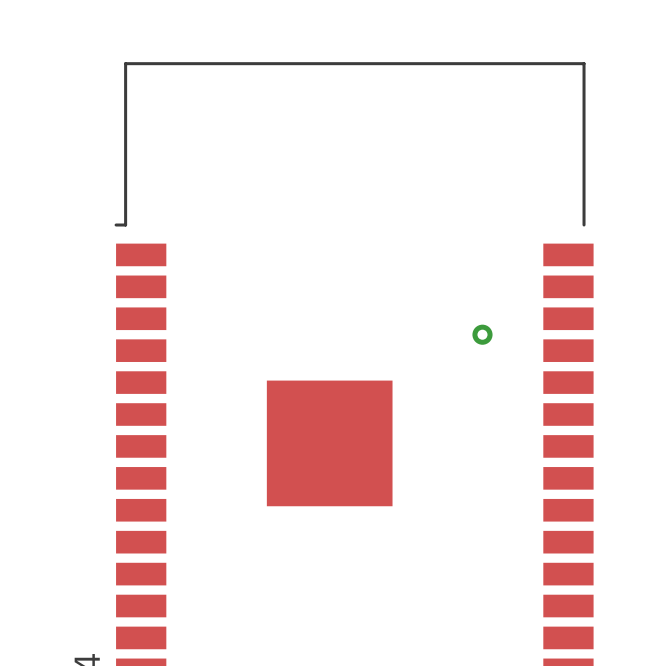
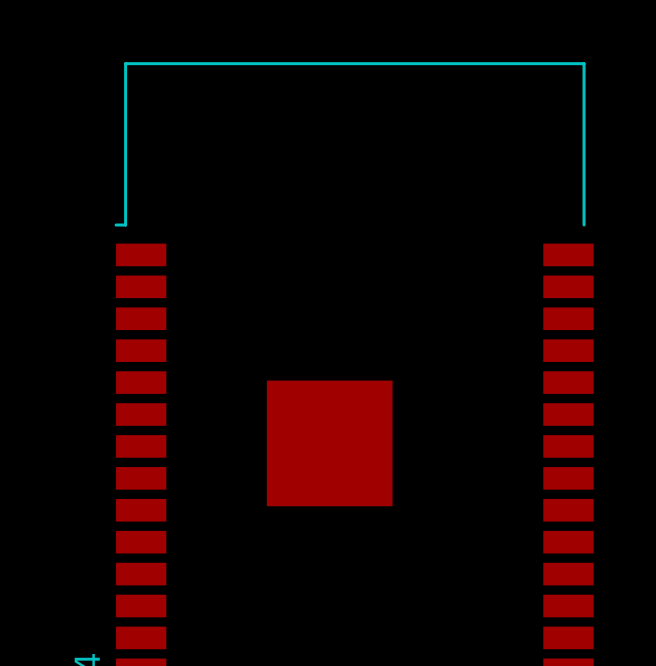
via: (482, 334) -> none

